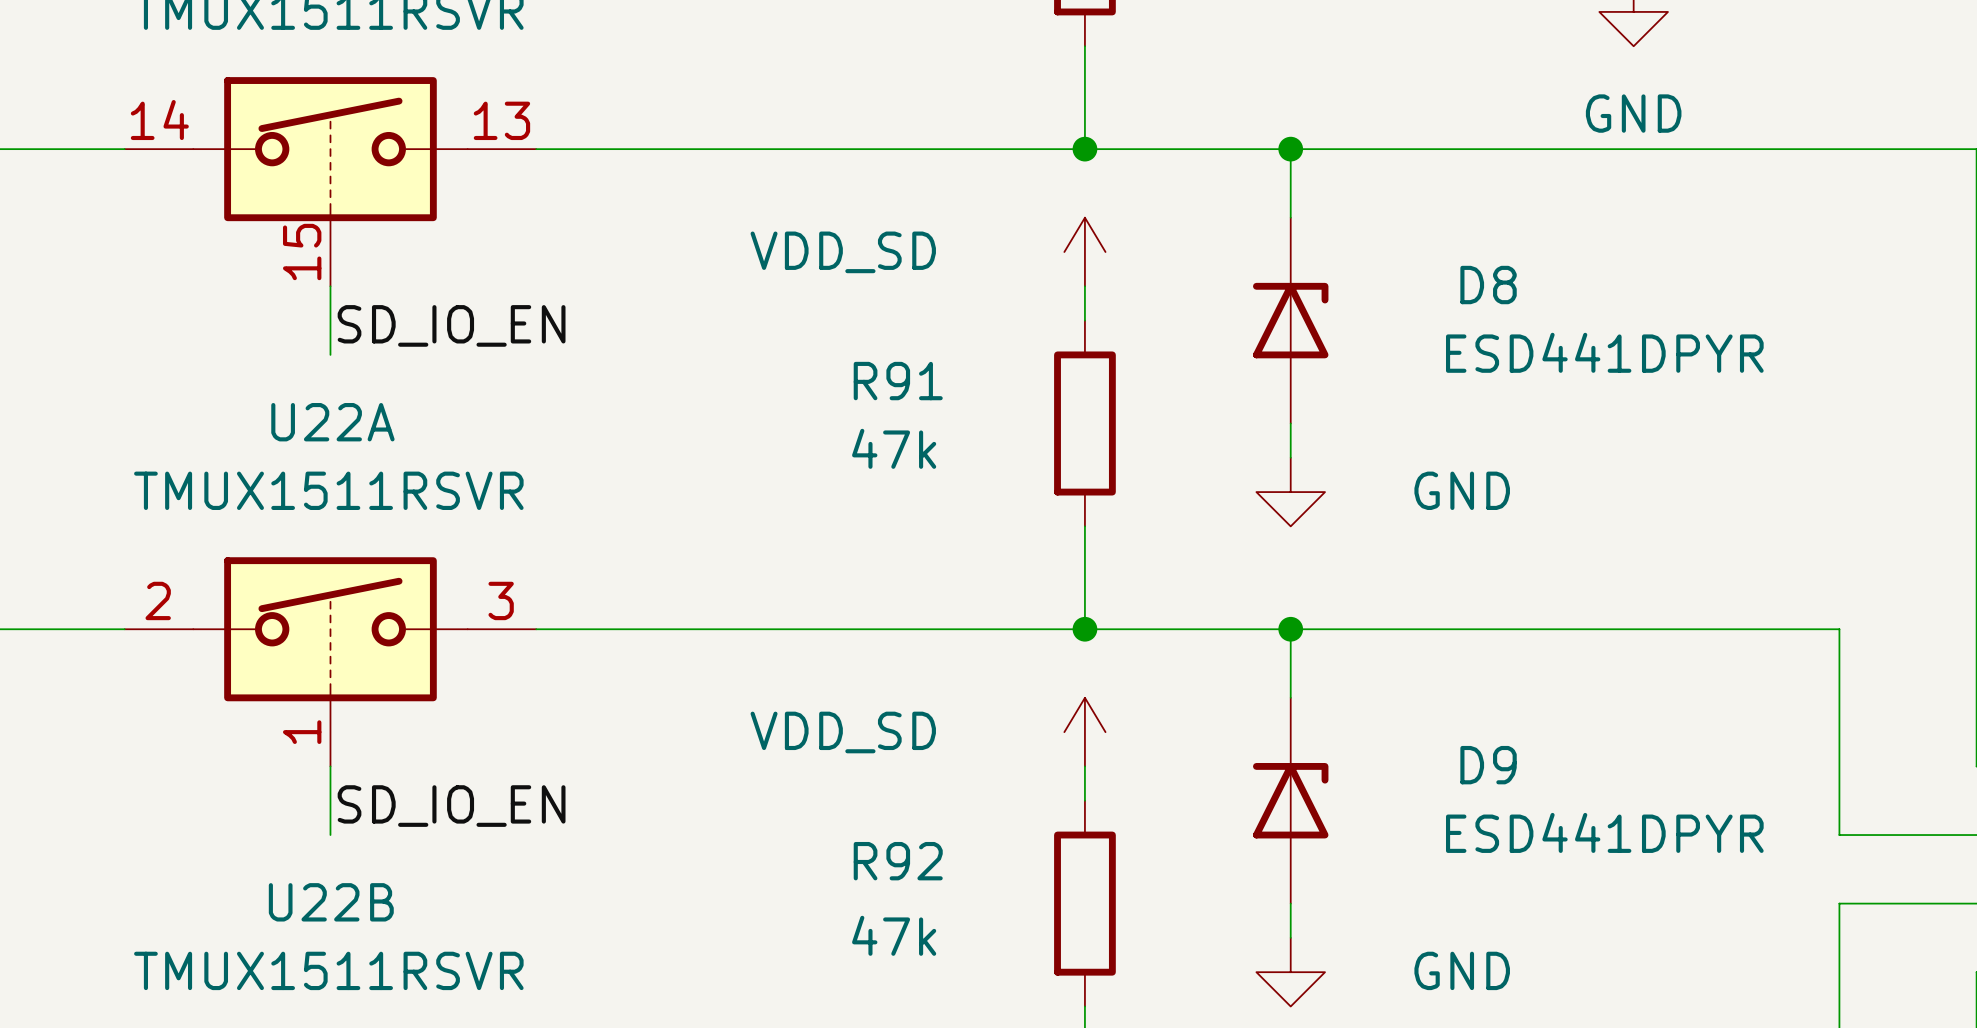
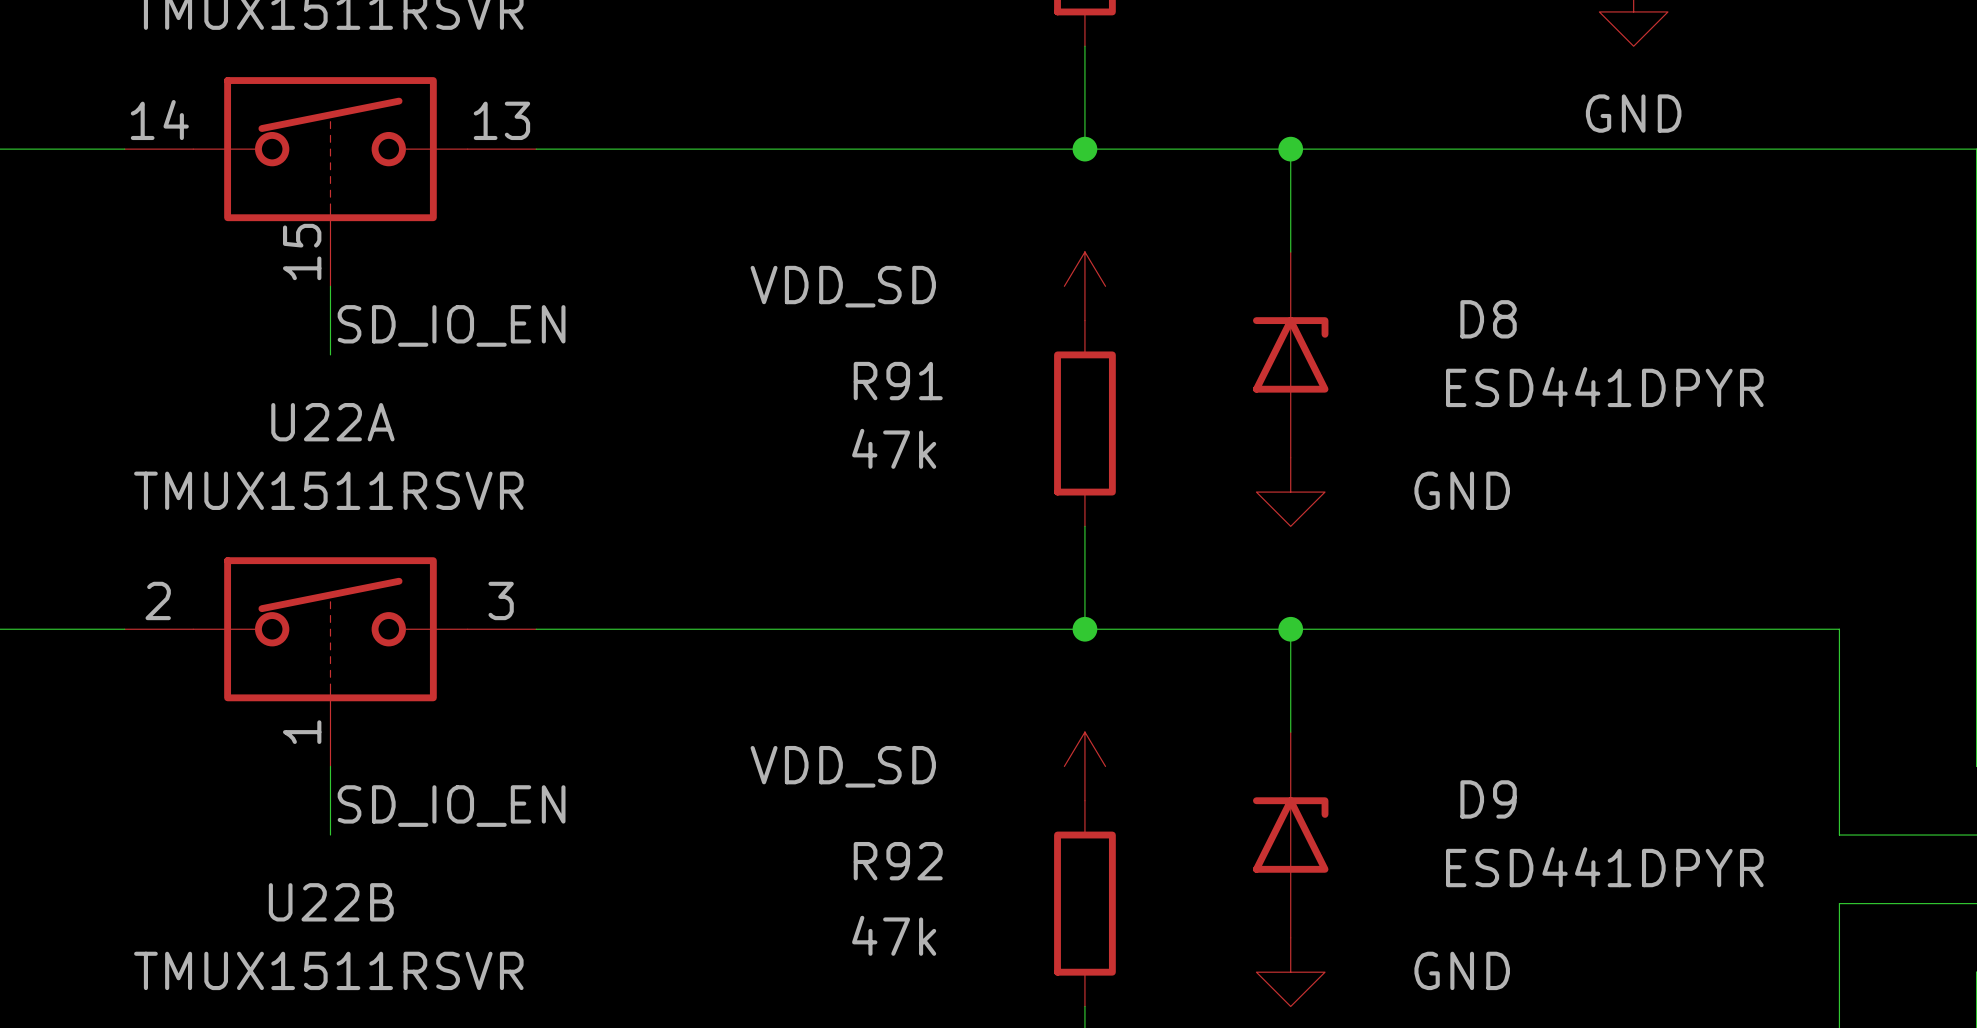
power symbol position: VDD_SD (1084, 252) -> VDD_SD (1084, 286)
D8 position: (1290, 320) -> (1290, 354)
power symbol position: VDD_SD (1084, 732) -> VDD_SD (1084, 766)
D9 position: (1290, 800) -> (1290, 835)

